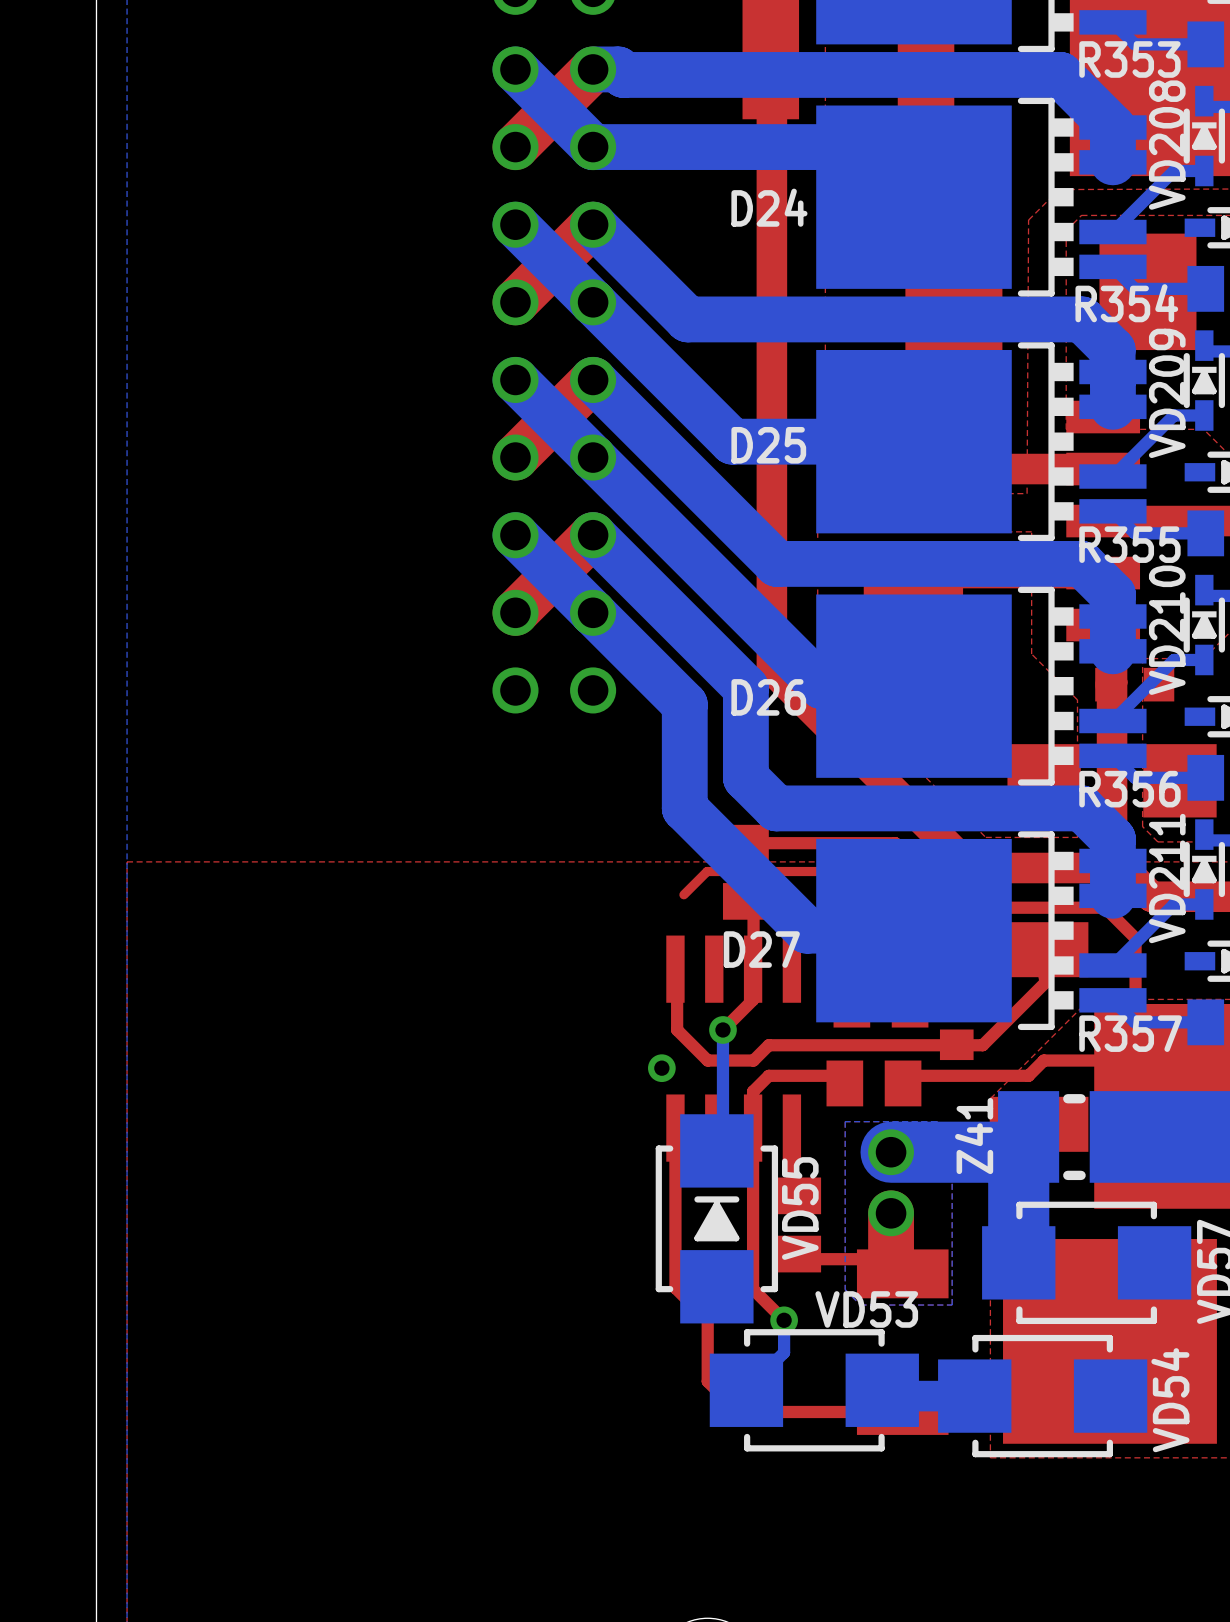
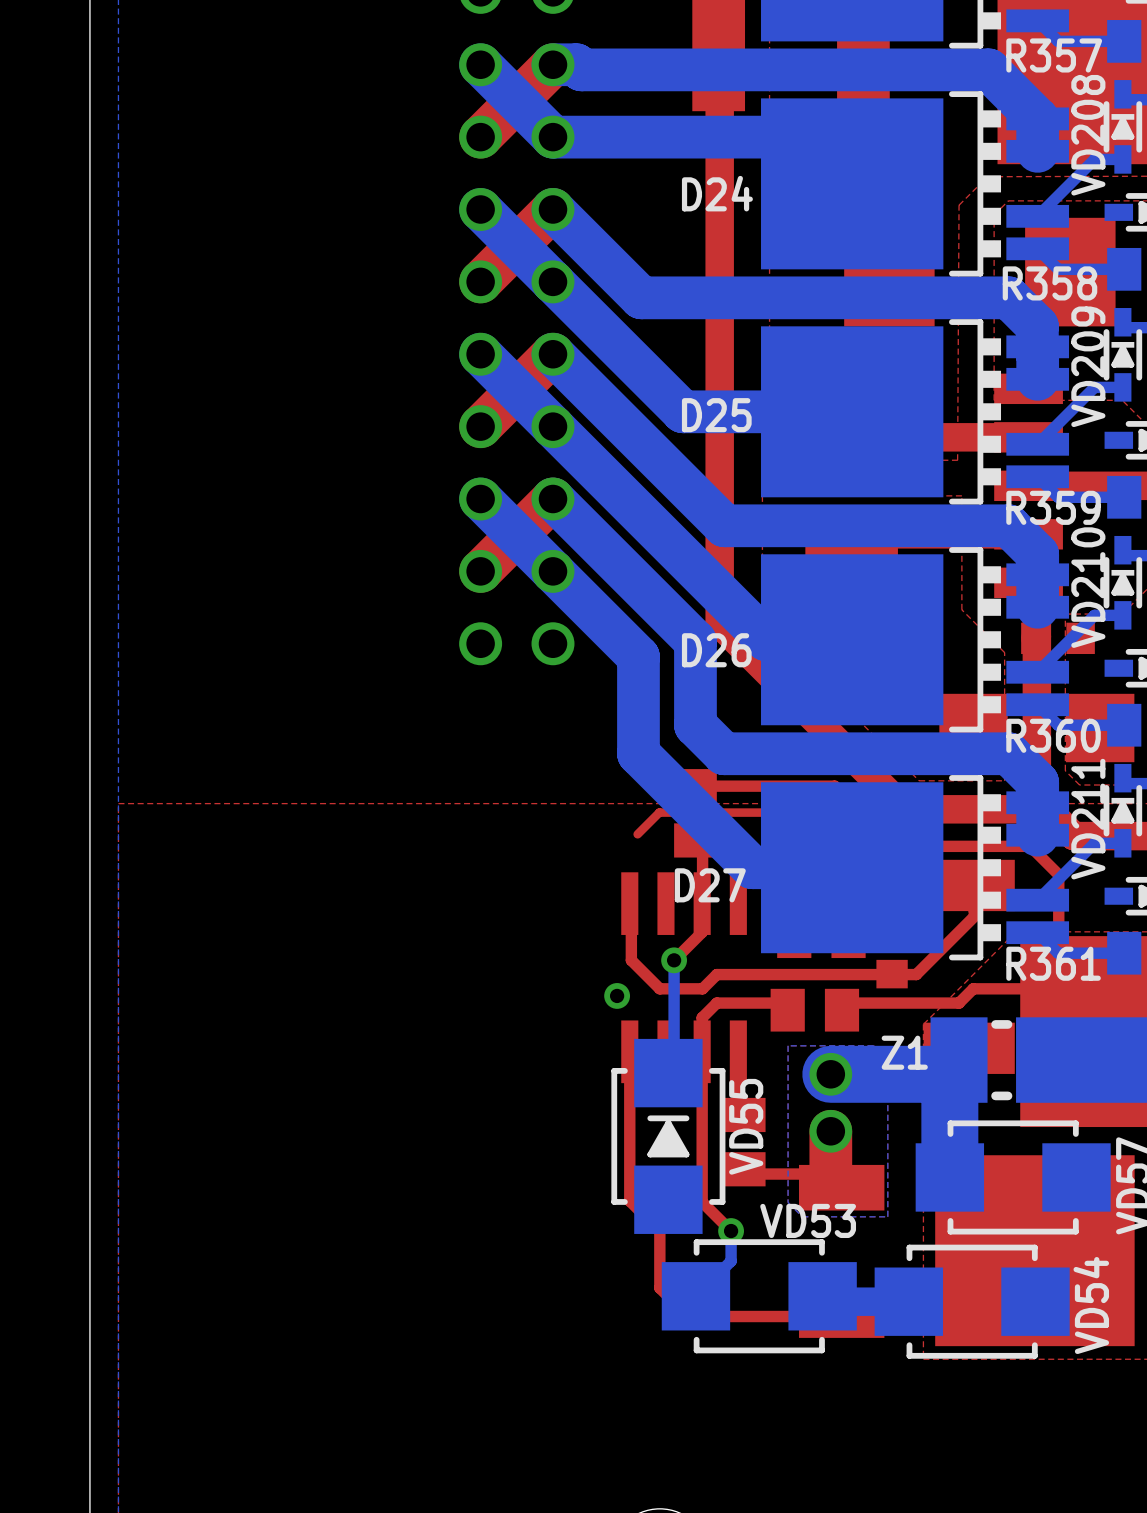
R353 name: R353 (1129, 59) -> R357 (1054, 55)
R354 name: R354 (1126, 303) -> R358 (1049, 283)
R355 name: R355 (1129, 544) -> R359 (1053, 507)
R356 name: R356 (1129, 789) -> R360 (1053, 735)
R357 name: R357 (1130, 1033) -> R361 (1053, 963)
Z41 name: Z41 (974, 1136) -> Z1 (904, 1052)

